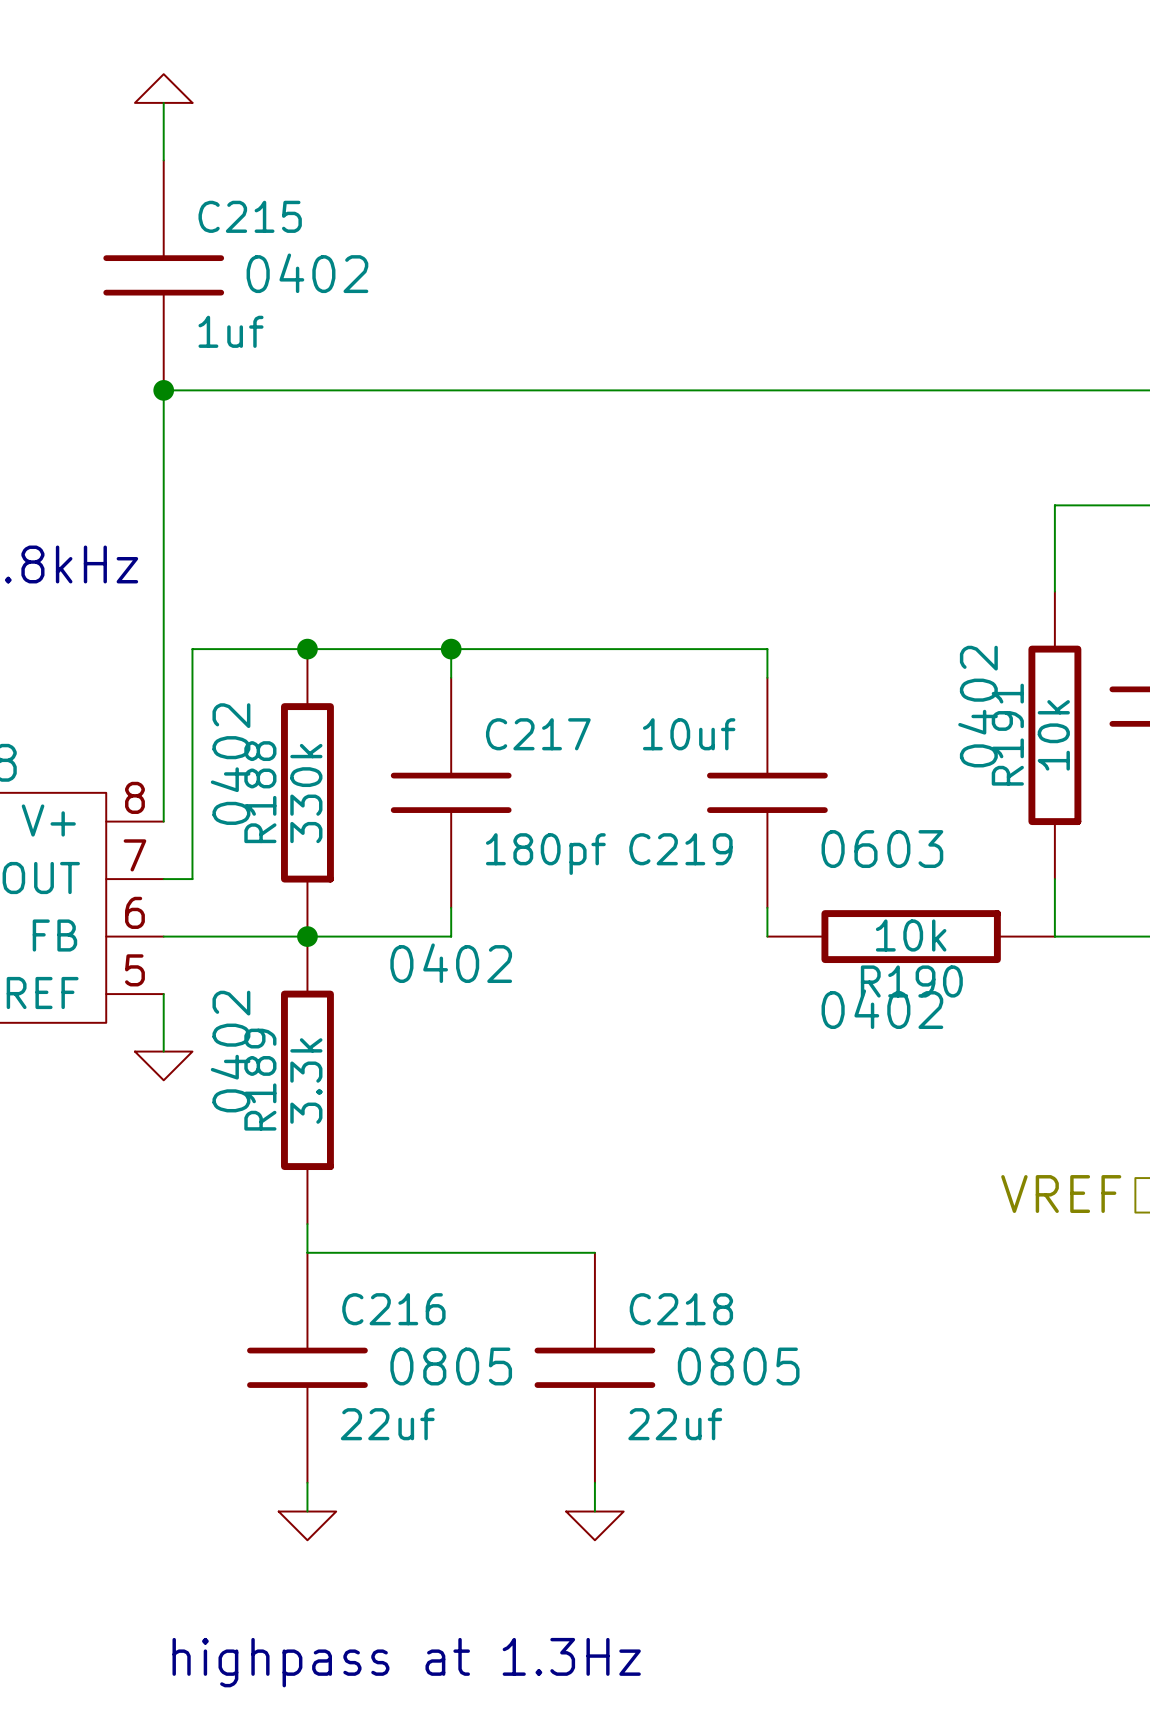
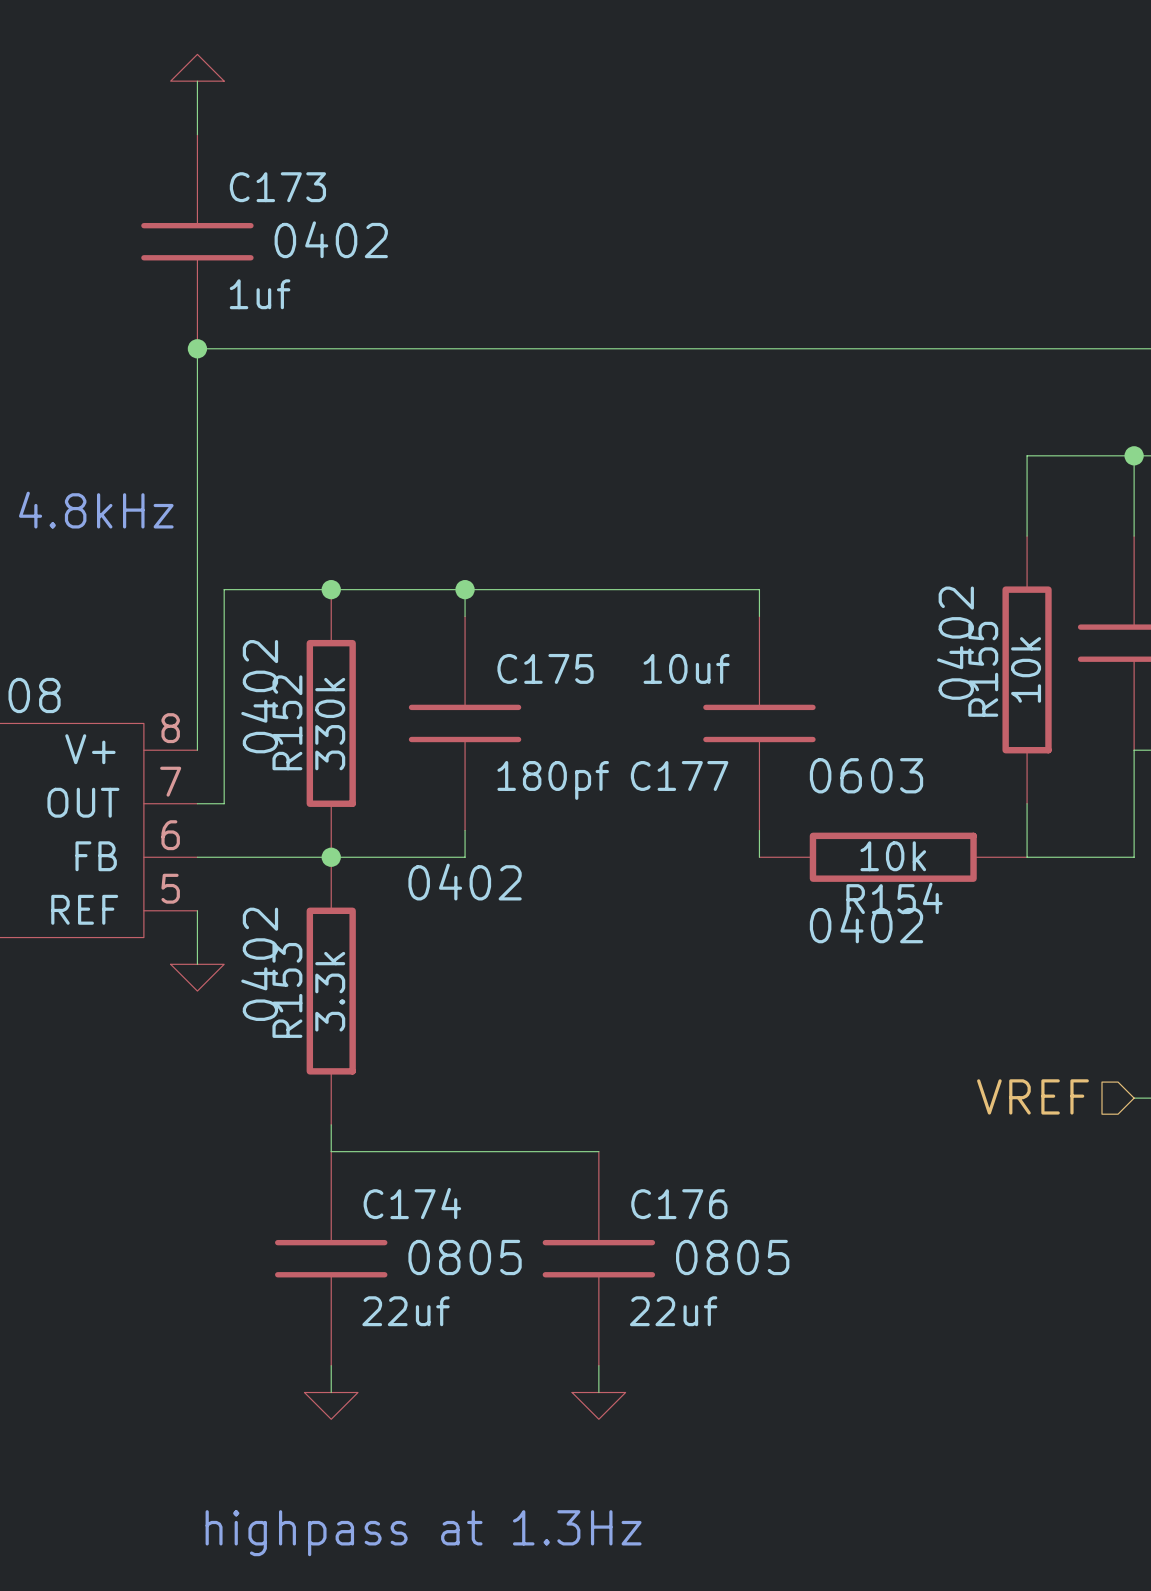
C215 name: C215 (250, 216) -> C173 (277, 187)
C217 name: C217 (538, 734) -> C175 (545, 668)
R191 name: R191 (1007, 734) -> R155 (983, 669)
R188 name: R188 (260, 792) -> R152 (287, 722)
C219 name: C219 (680, 849) -> C177 (679, 775)
R190 name: R190 (911, 981) -> R154 (894, 898)
R189 name: R189 (260, 1079) -> R153 (287, 990)
C216 name: C216 (393, 1309) -> C174 (412, 1203)
C218 name: C218 (681, 1309) -> C176 (679, 1204)

